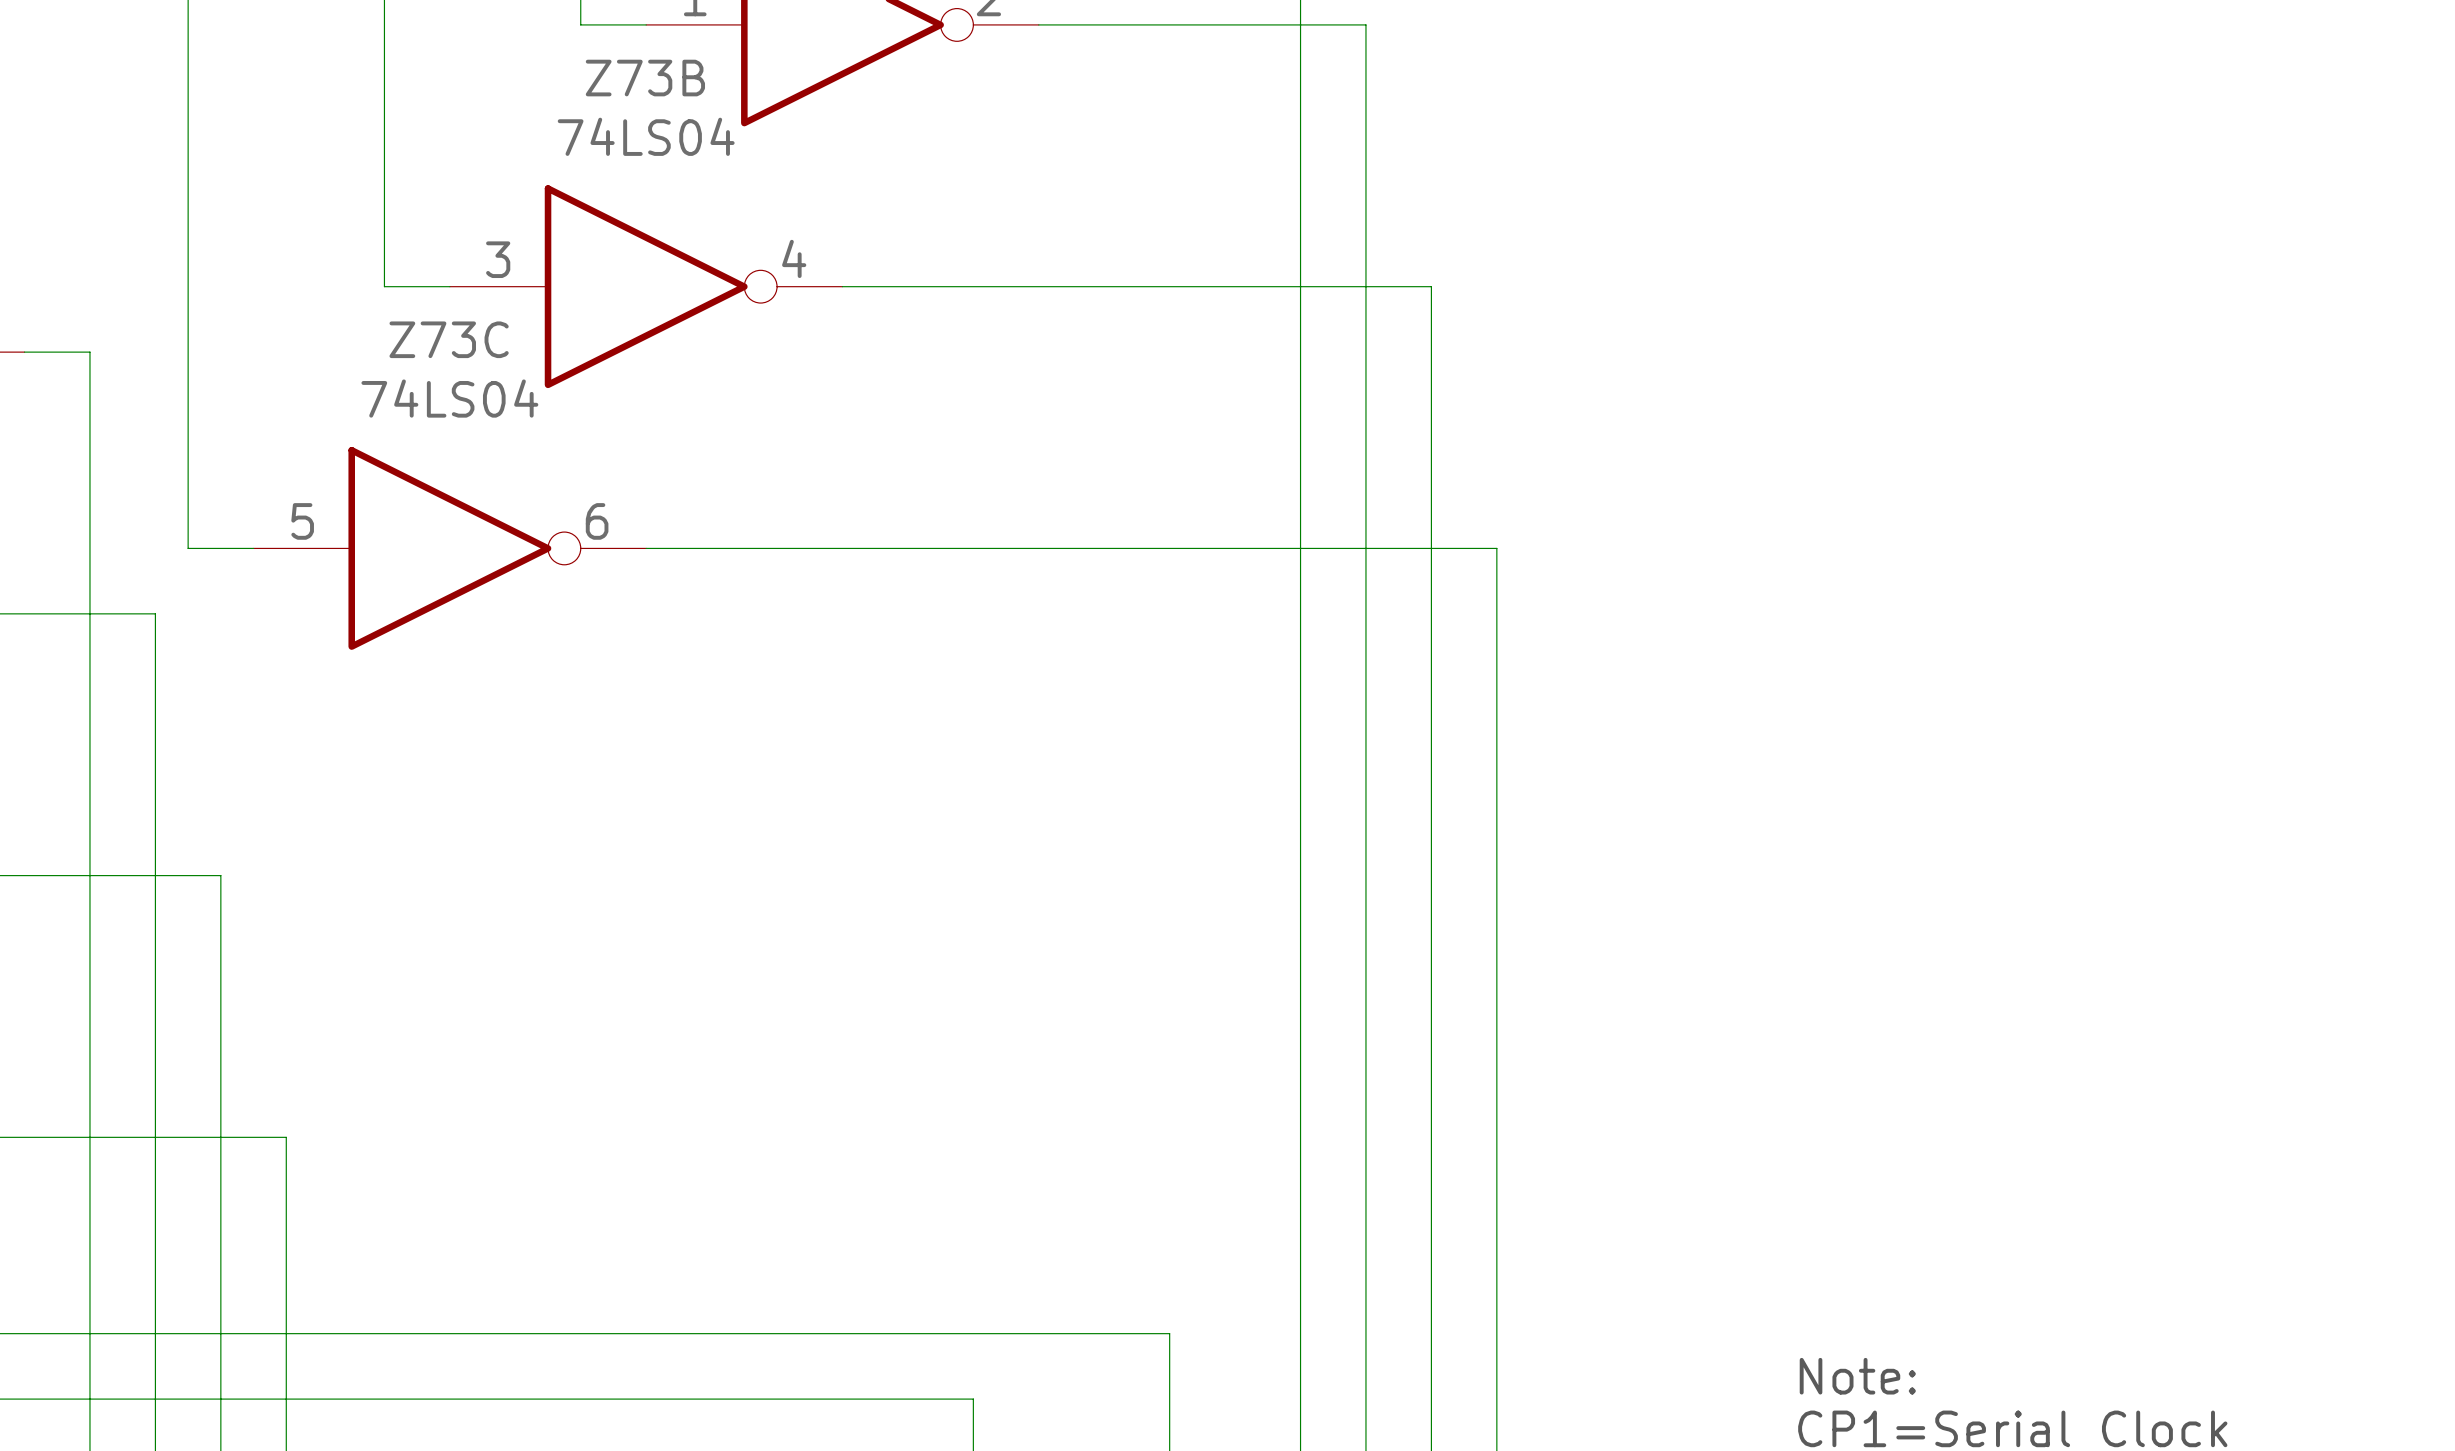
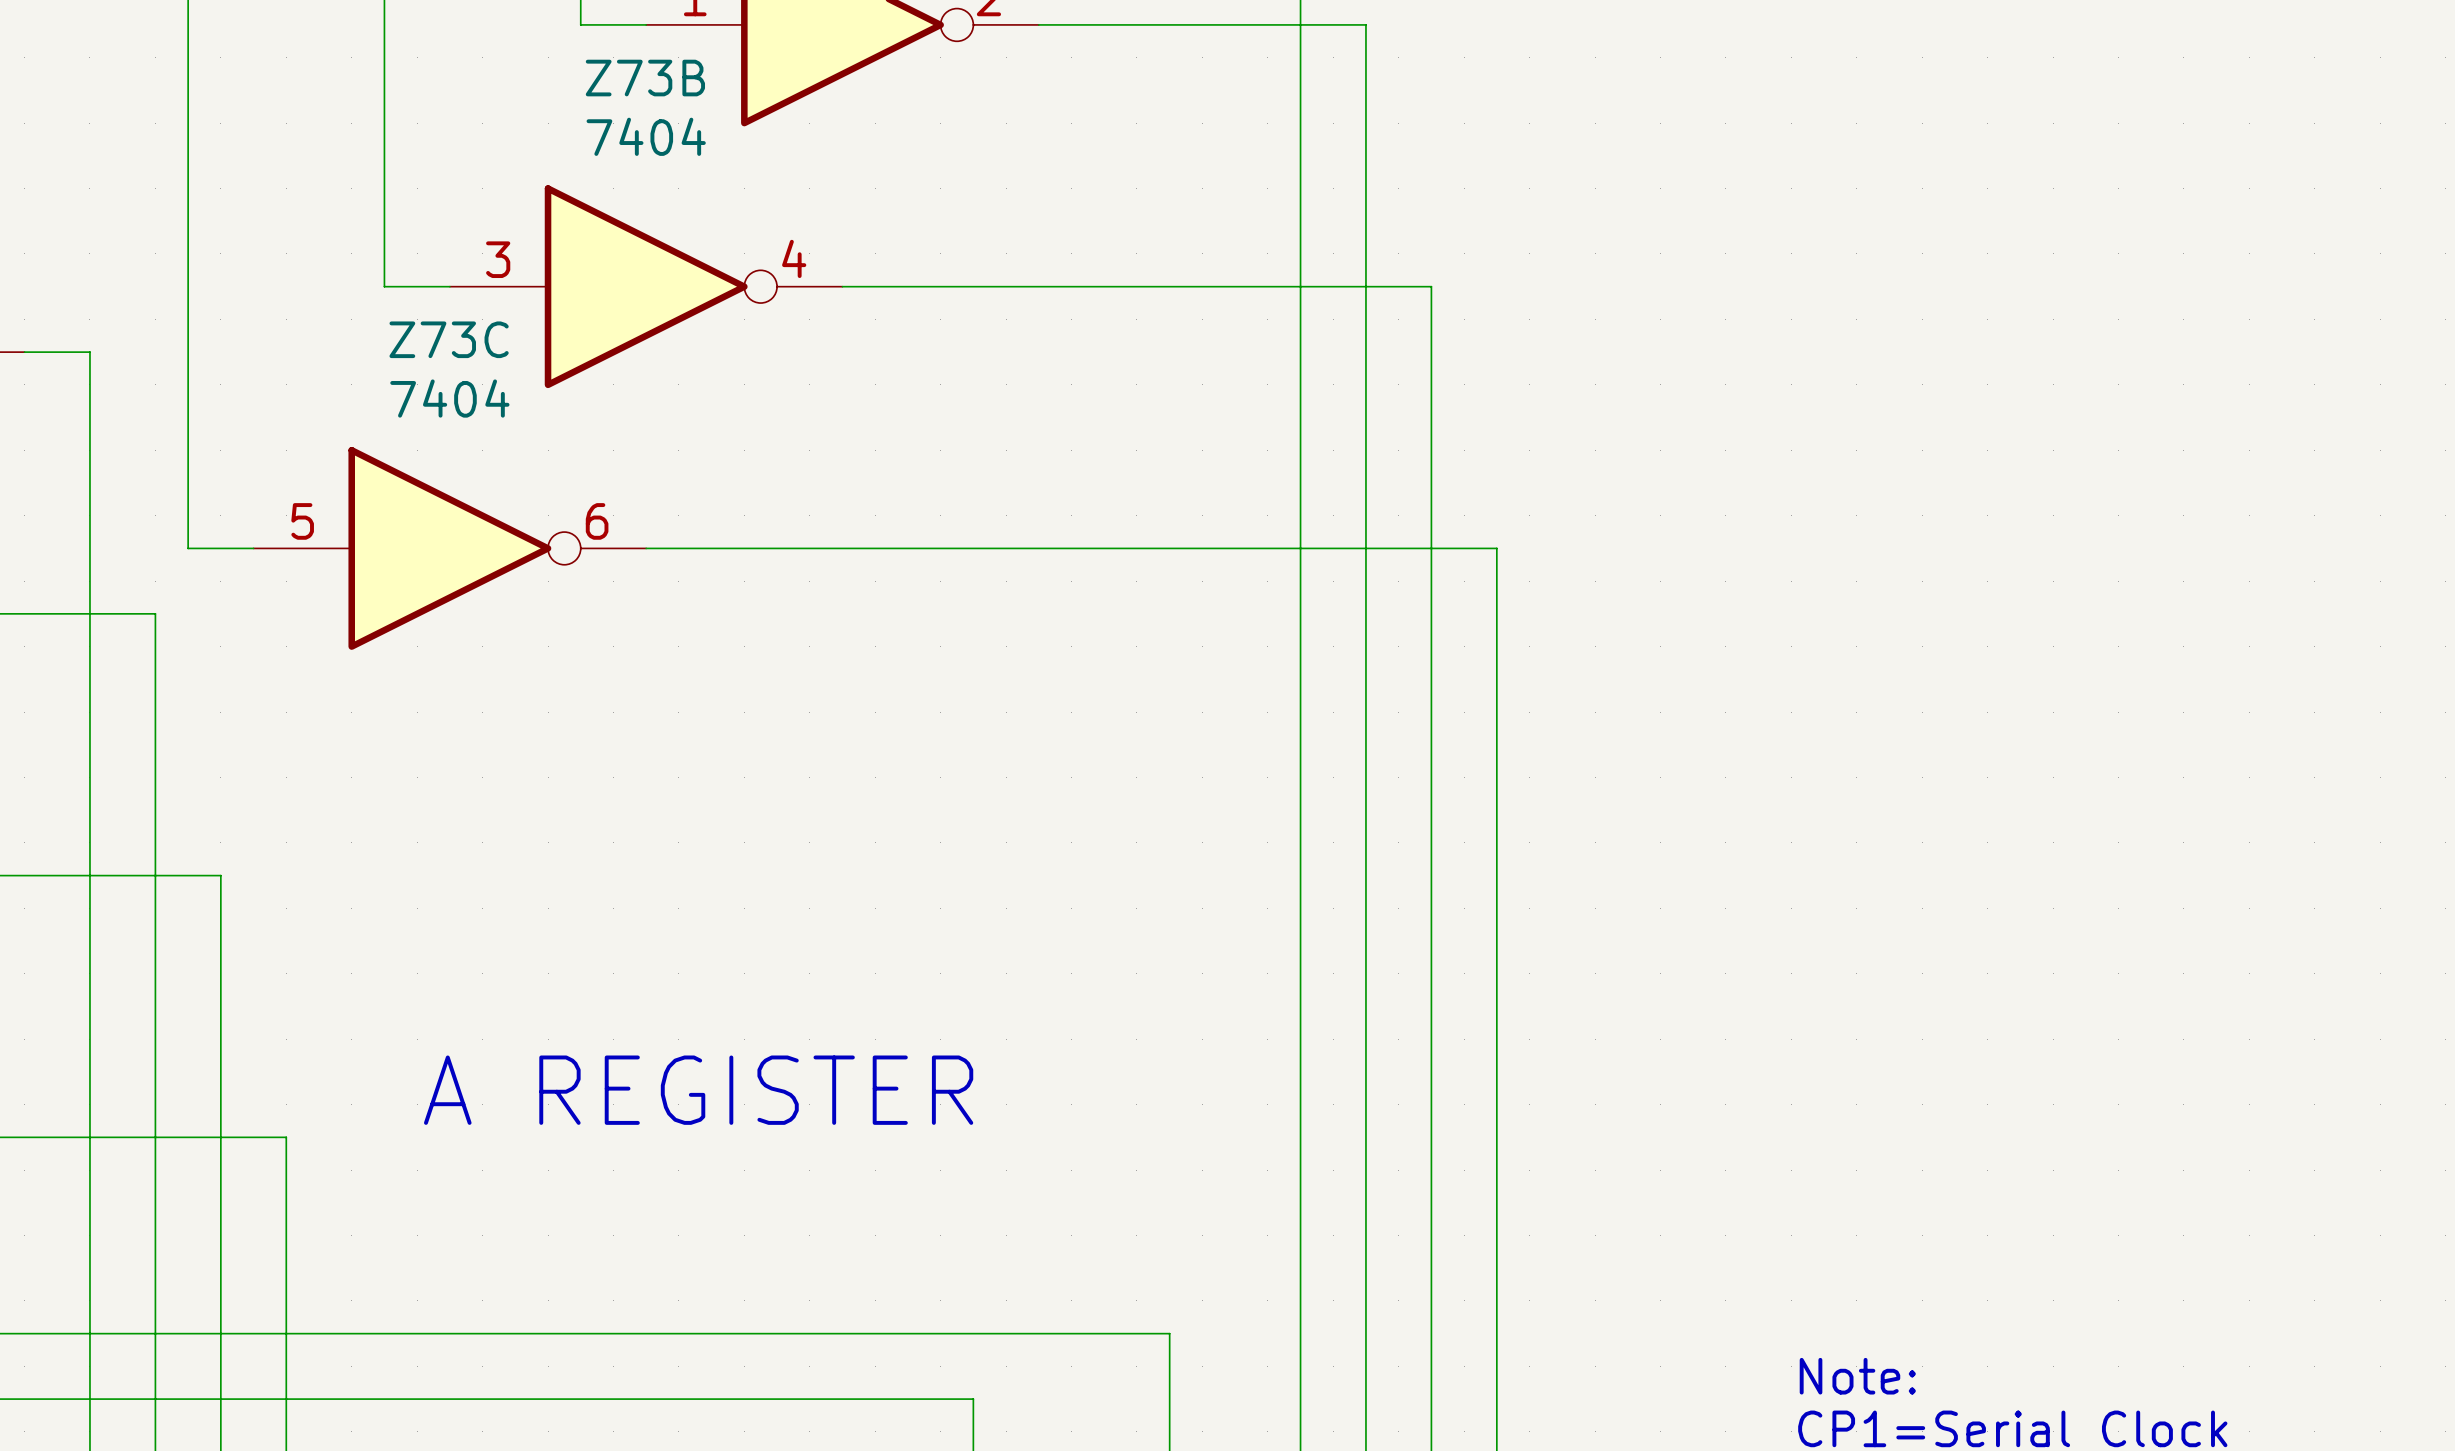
Z73B value: 74LS04 (646, 136) -> 7404 (646, 136)
Z73C value: 74LS04 (449, 398) -> 7404 (449, 398)
text: none -> A REGISTER (698, 1090)

